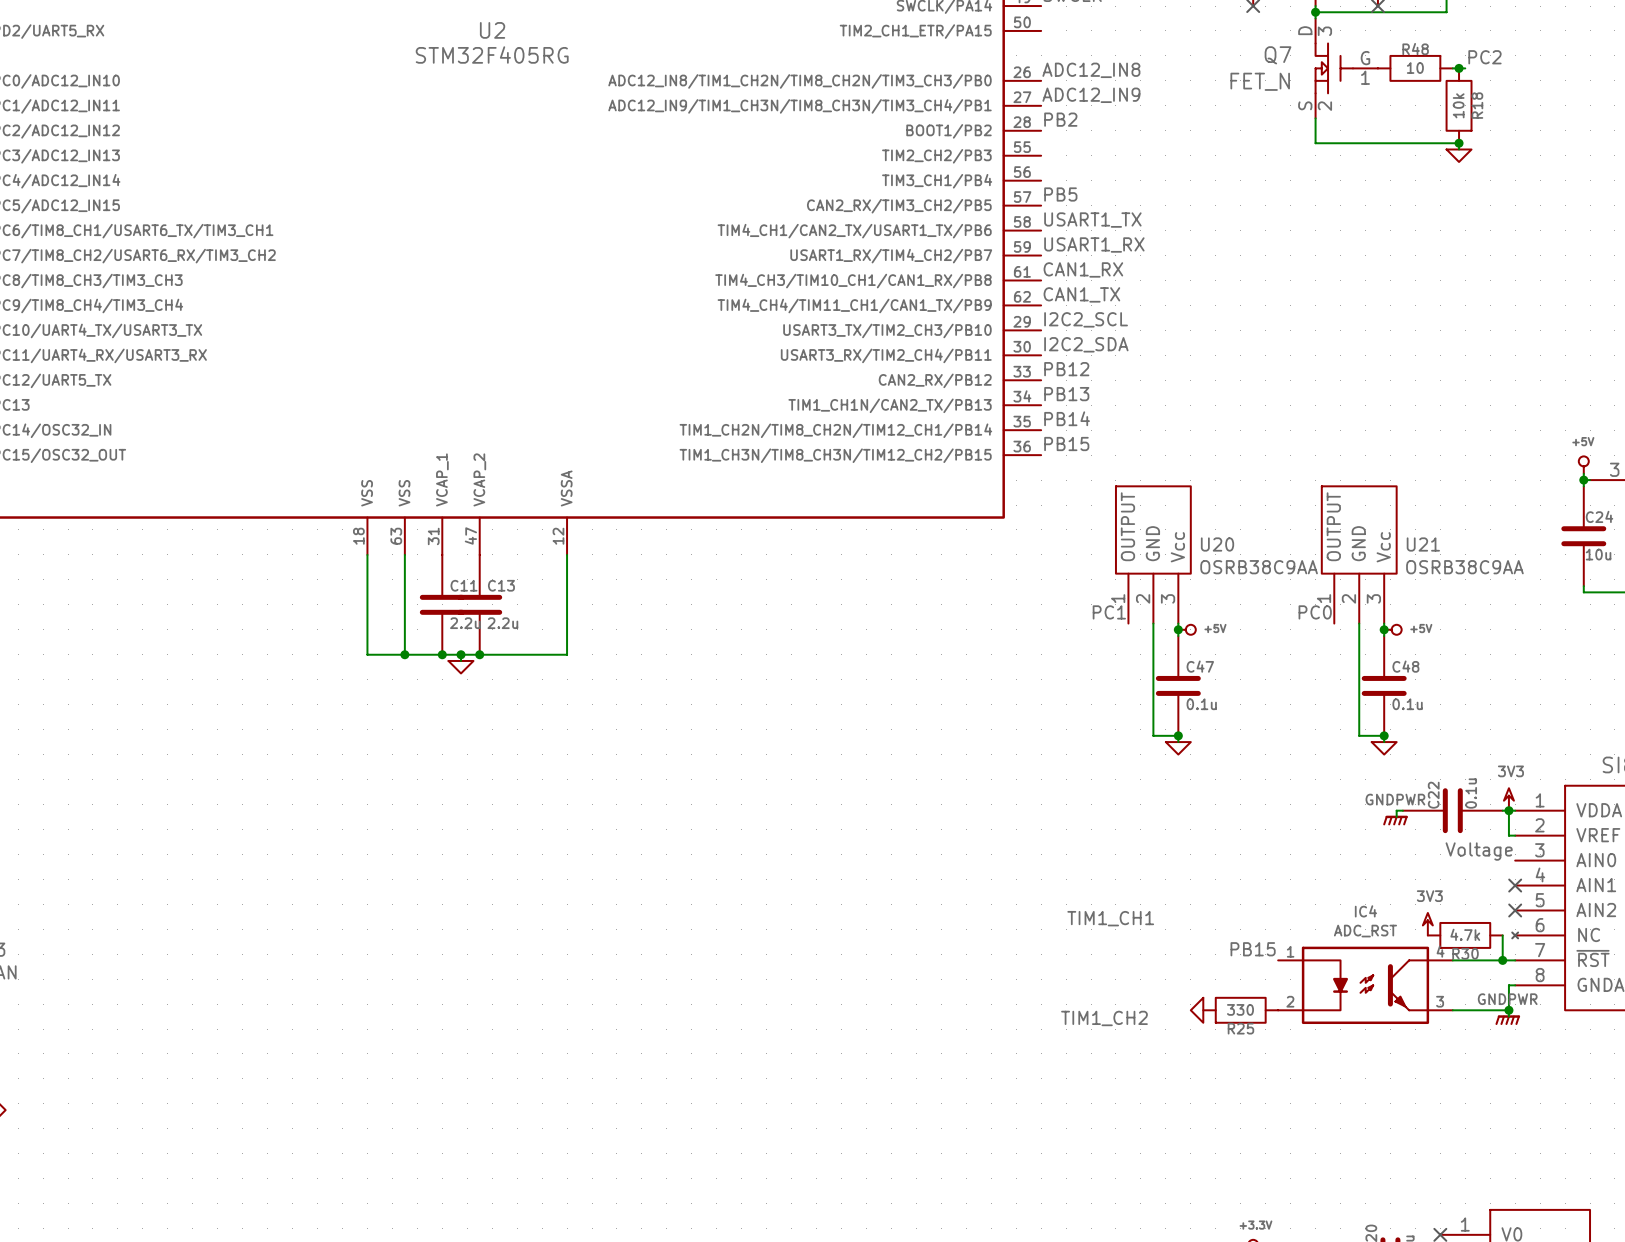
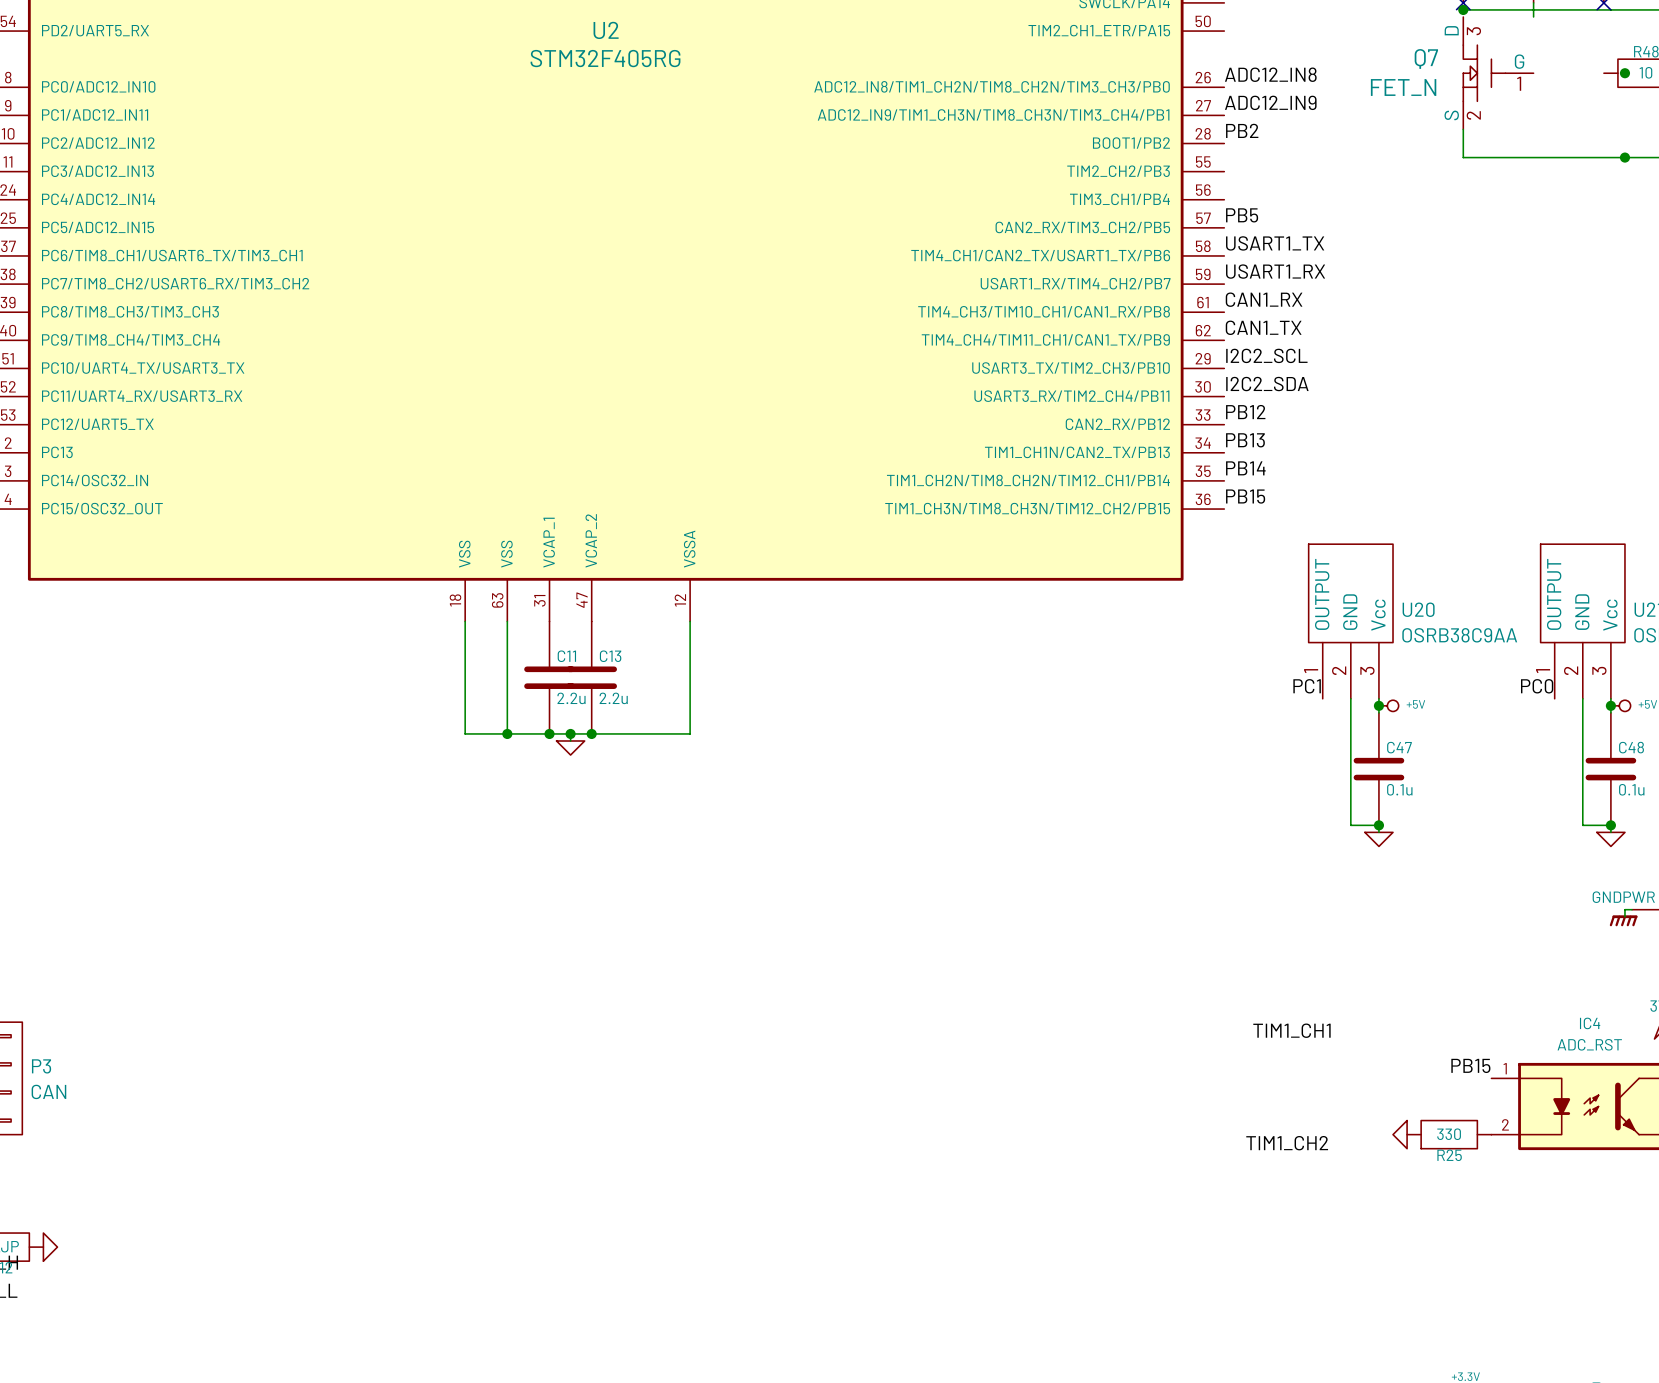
wire: none -> (1463, 9) (1533, 9)
junction: none -> (1463, 9)
junction: (1315, 12) -> none
Q7 position: (1346, 68) -> (1498, 73)
junction: none -> (1624, 73)
wire: (1315, 118) (1315, 143) -> (1463, 129) (1463, 157) (1533, 157)
junction: none -> (1624, 157)

